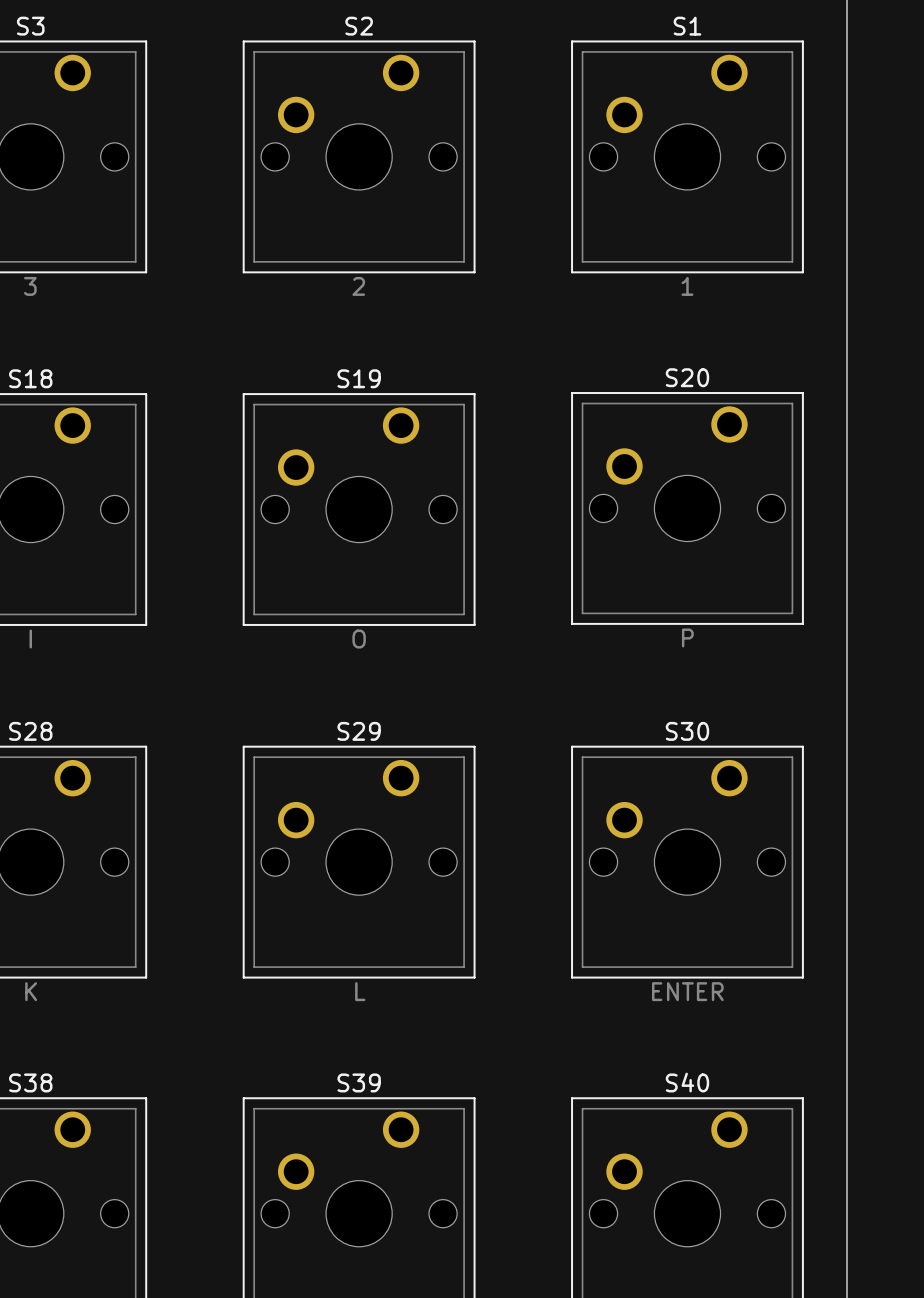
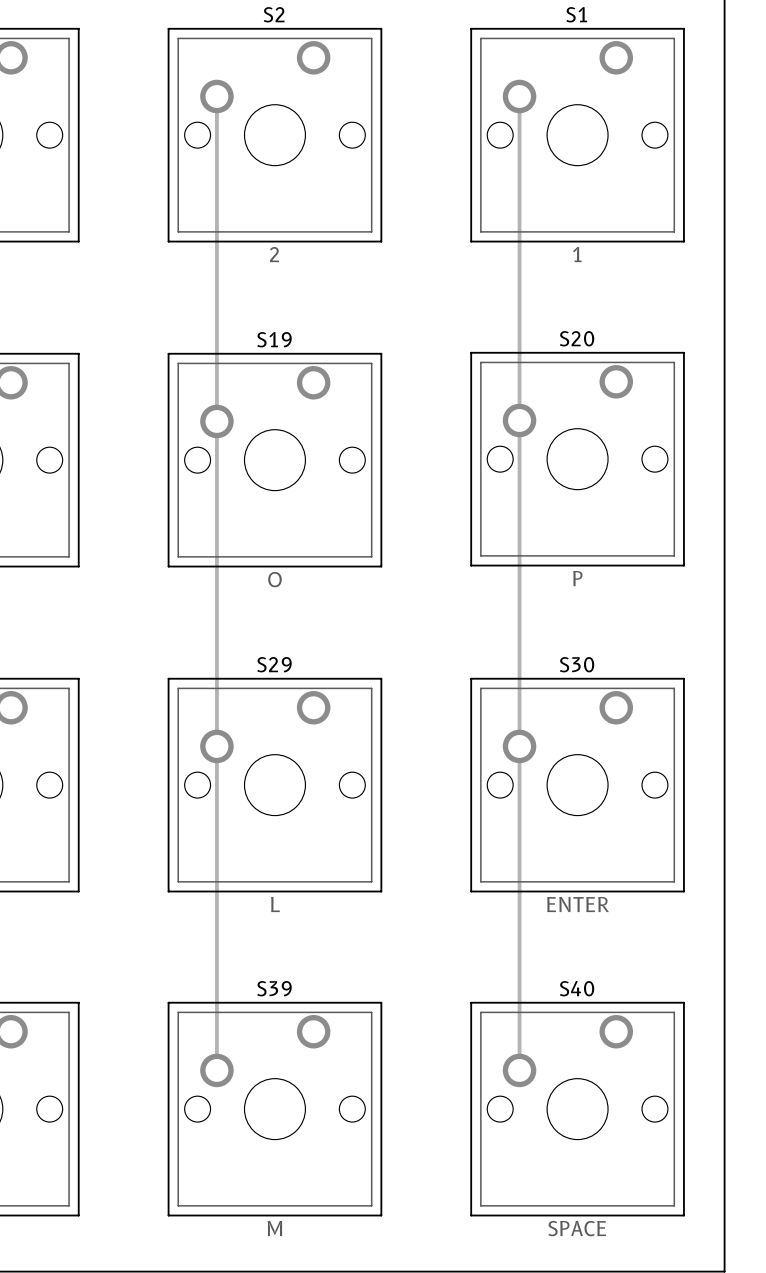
track: none -> (216, 96) (216, 1070)
track: none -> (519, 96) (519, 1070)

